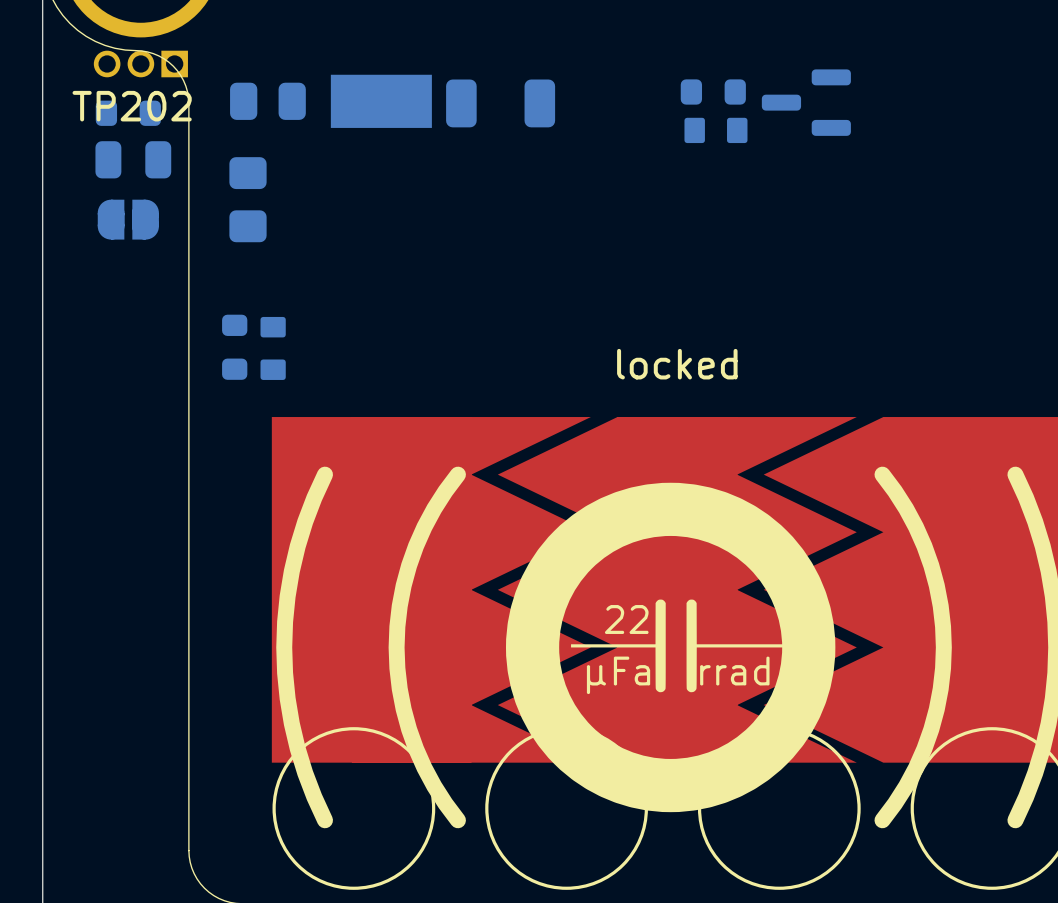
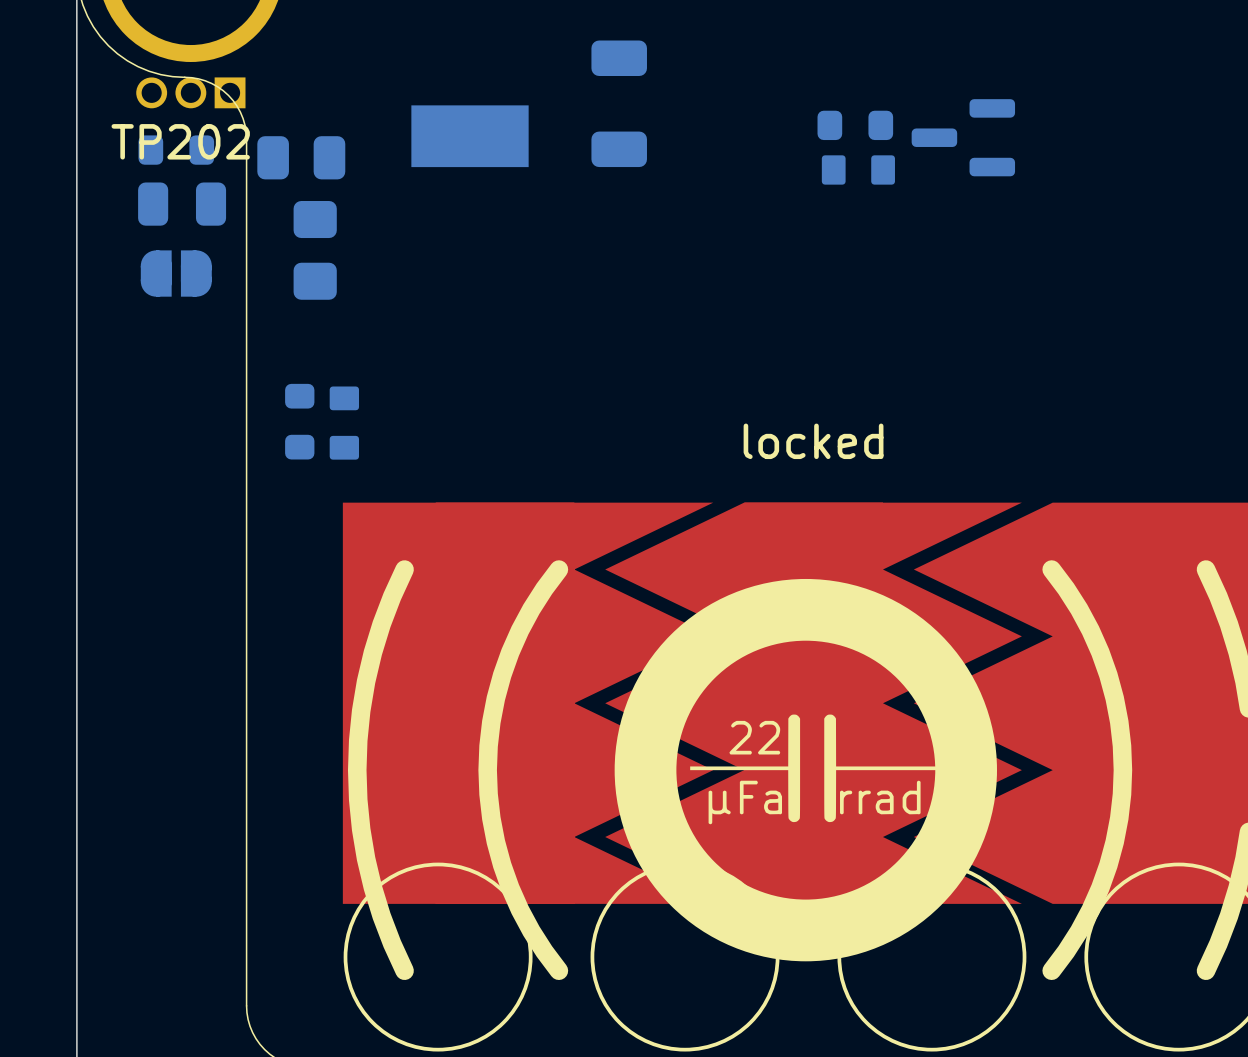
part position: (267, 101) -> (301, 157)
part rotation: 0° (500, 103) -> 90° clockwise (619, 103)

